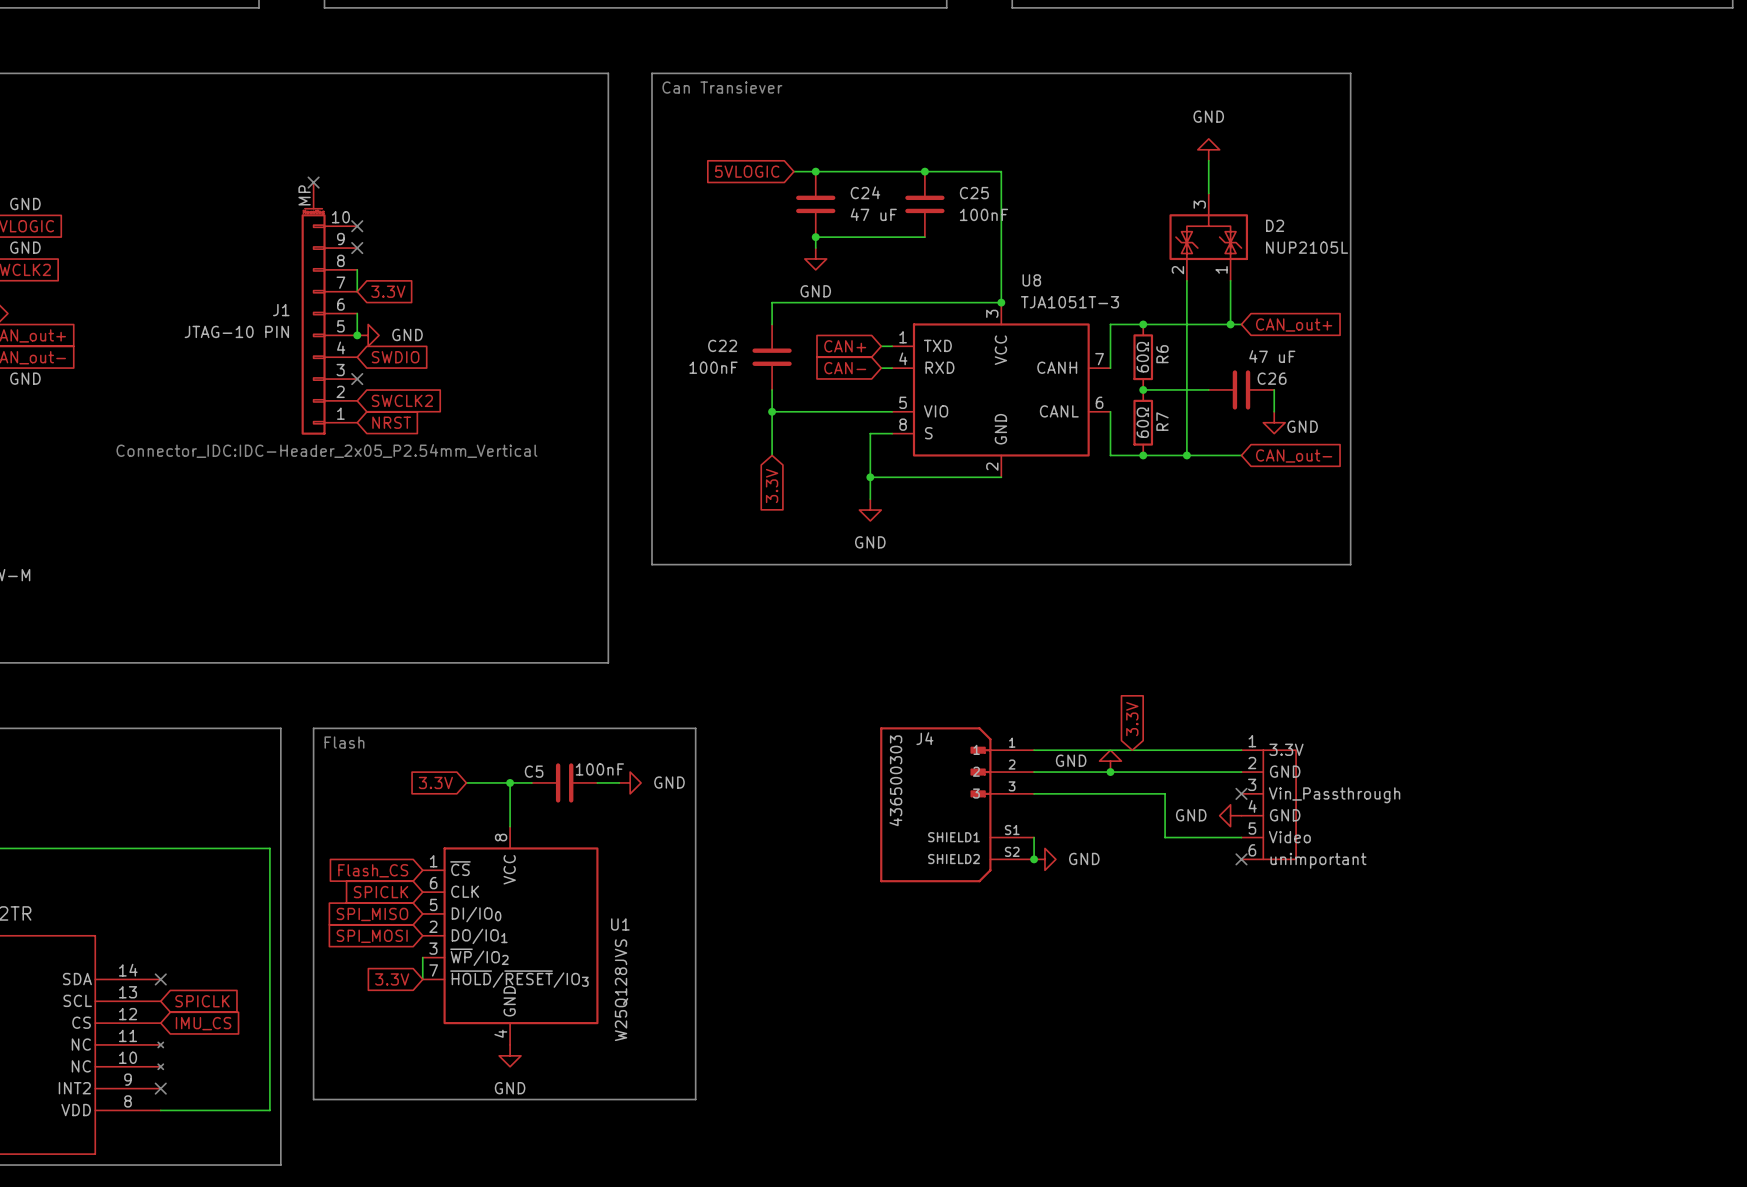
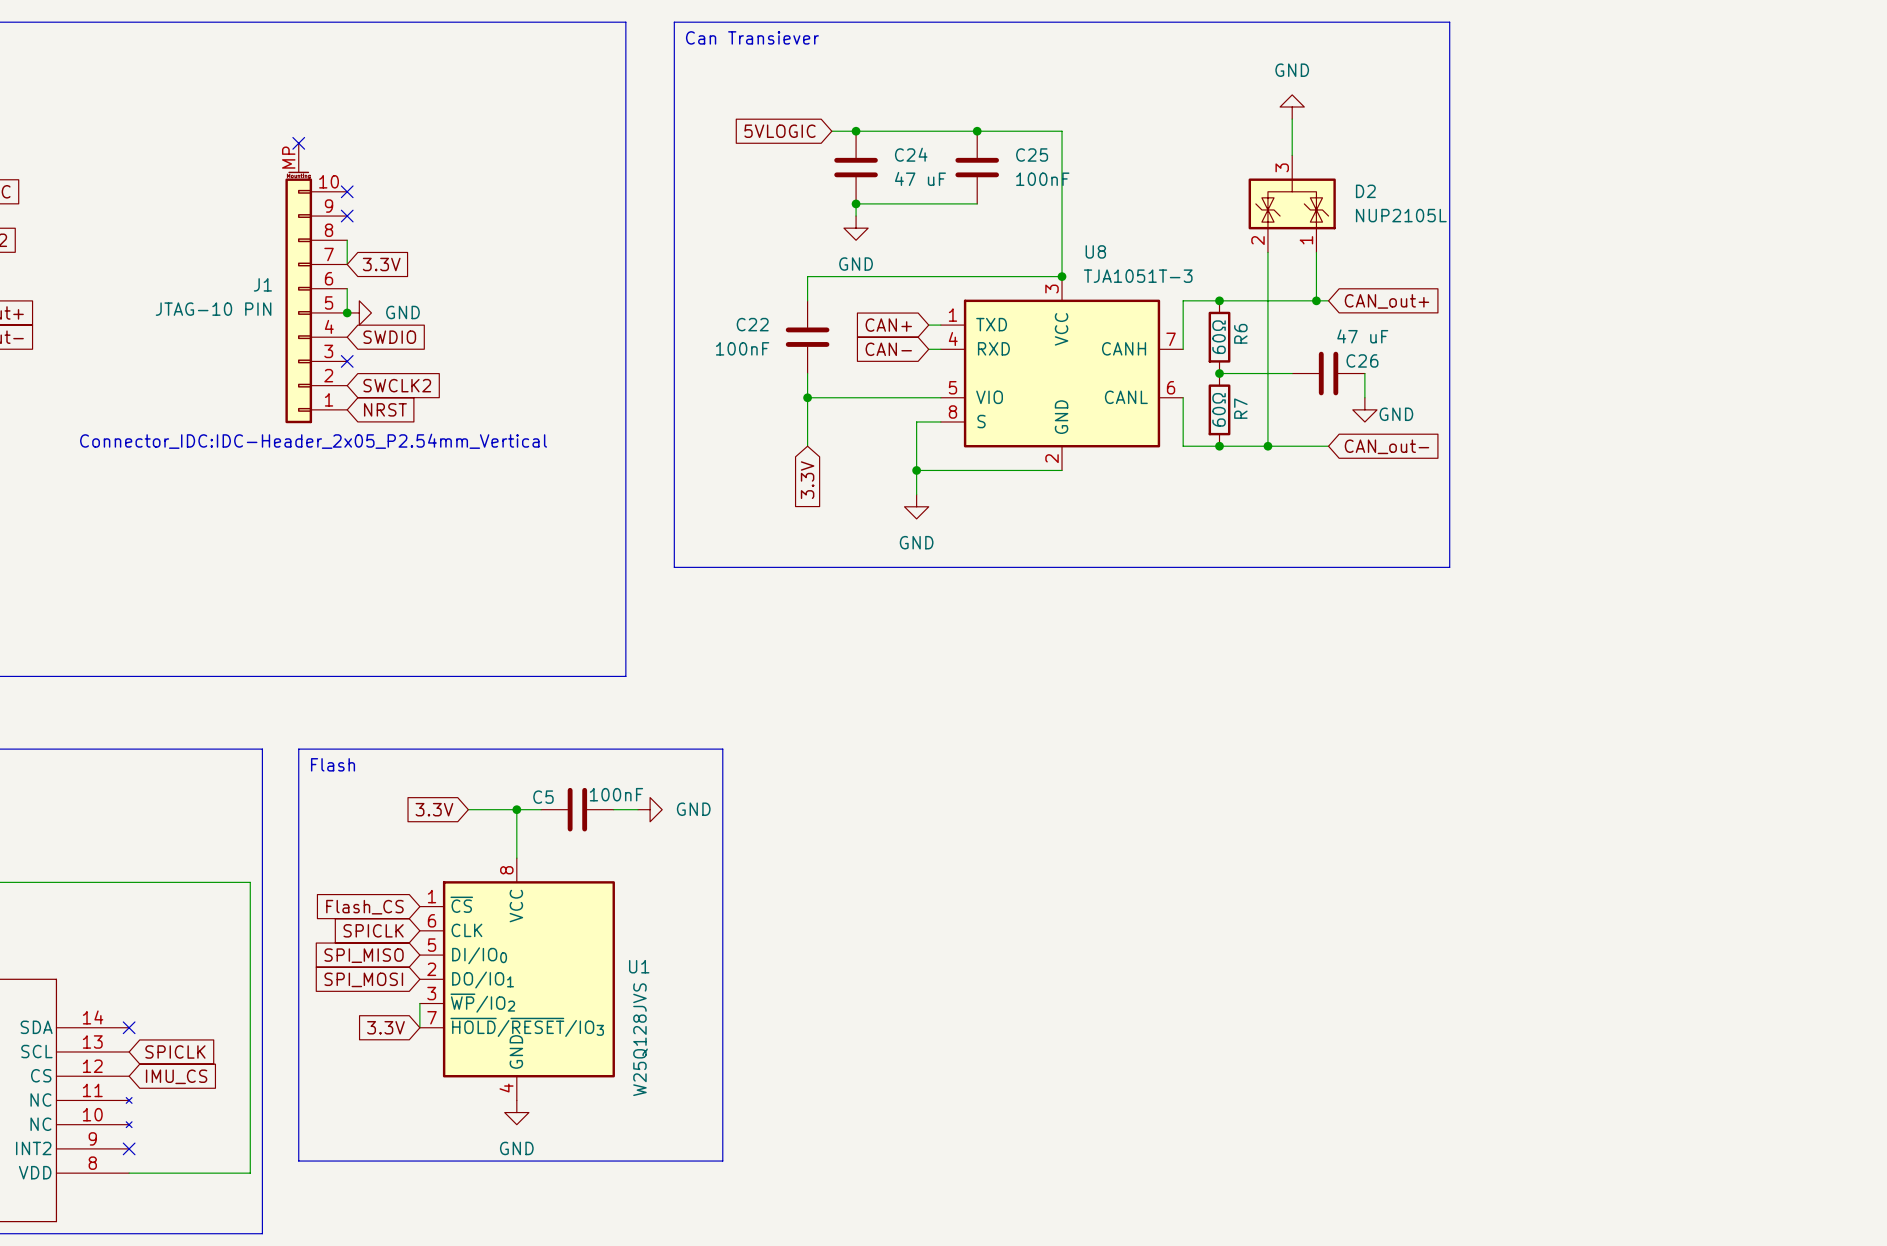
global label: 3.3V (1132, 719) -> none
wire: (1034, 750) (1241, 750) -> none
power symbol: GND (1110, 761) -> none
wire: (1034, 772) (1241, 772) -> none
junction: (1110, 772) -> none
wire: (1034, 793) (1165, 793) (1165, 837) (1241, 837) -> none
no-connect mark: (1241, 793) -> none
J4: 436500303 (957, 804) -> none
part: (1268, 804) -> none
power symbol: GND (1230, 815) -> none
wire: (1034, 837) (1034, 859) -> none
junction: (1034, 859) -> none
power symbol: GND (1044, 859) -> none
no-connect mark: (1241, 859) -> none

